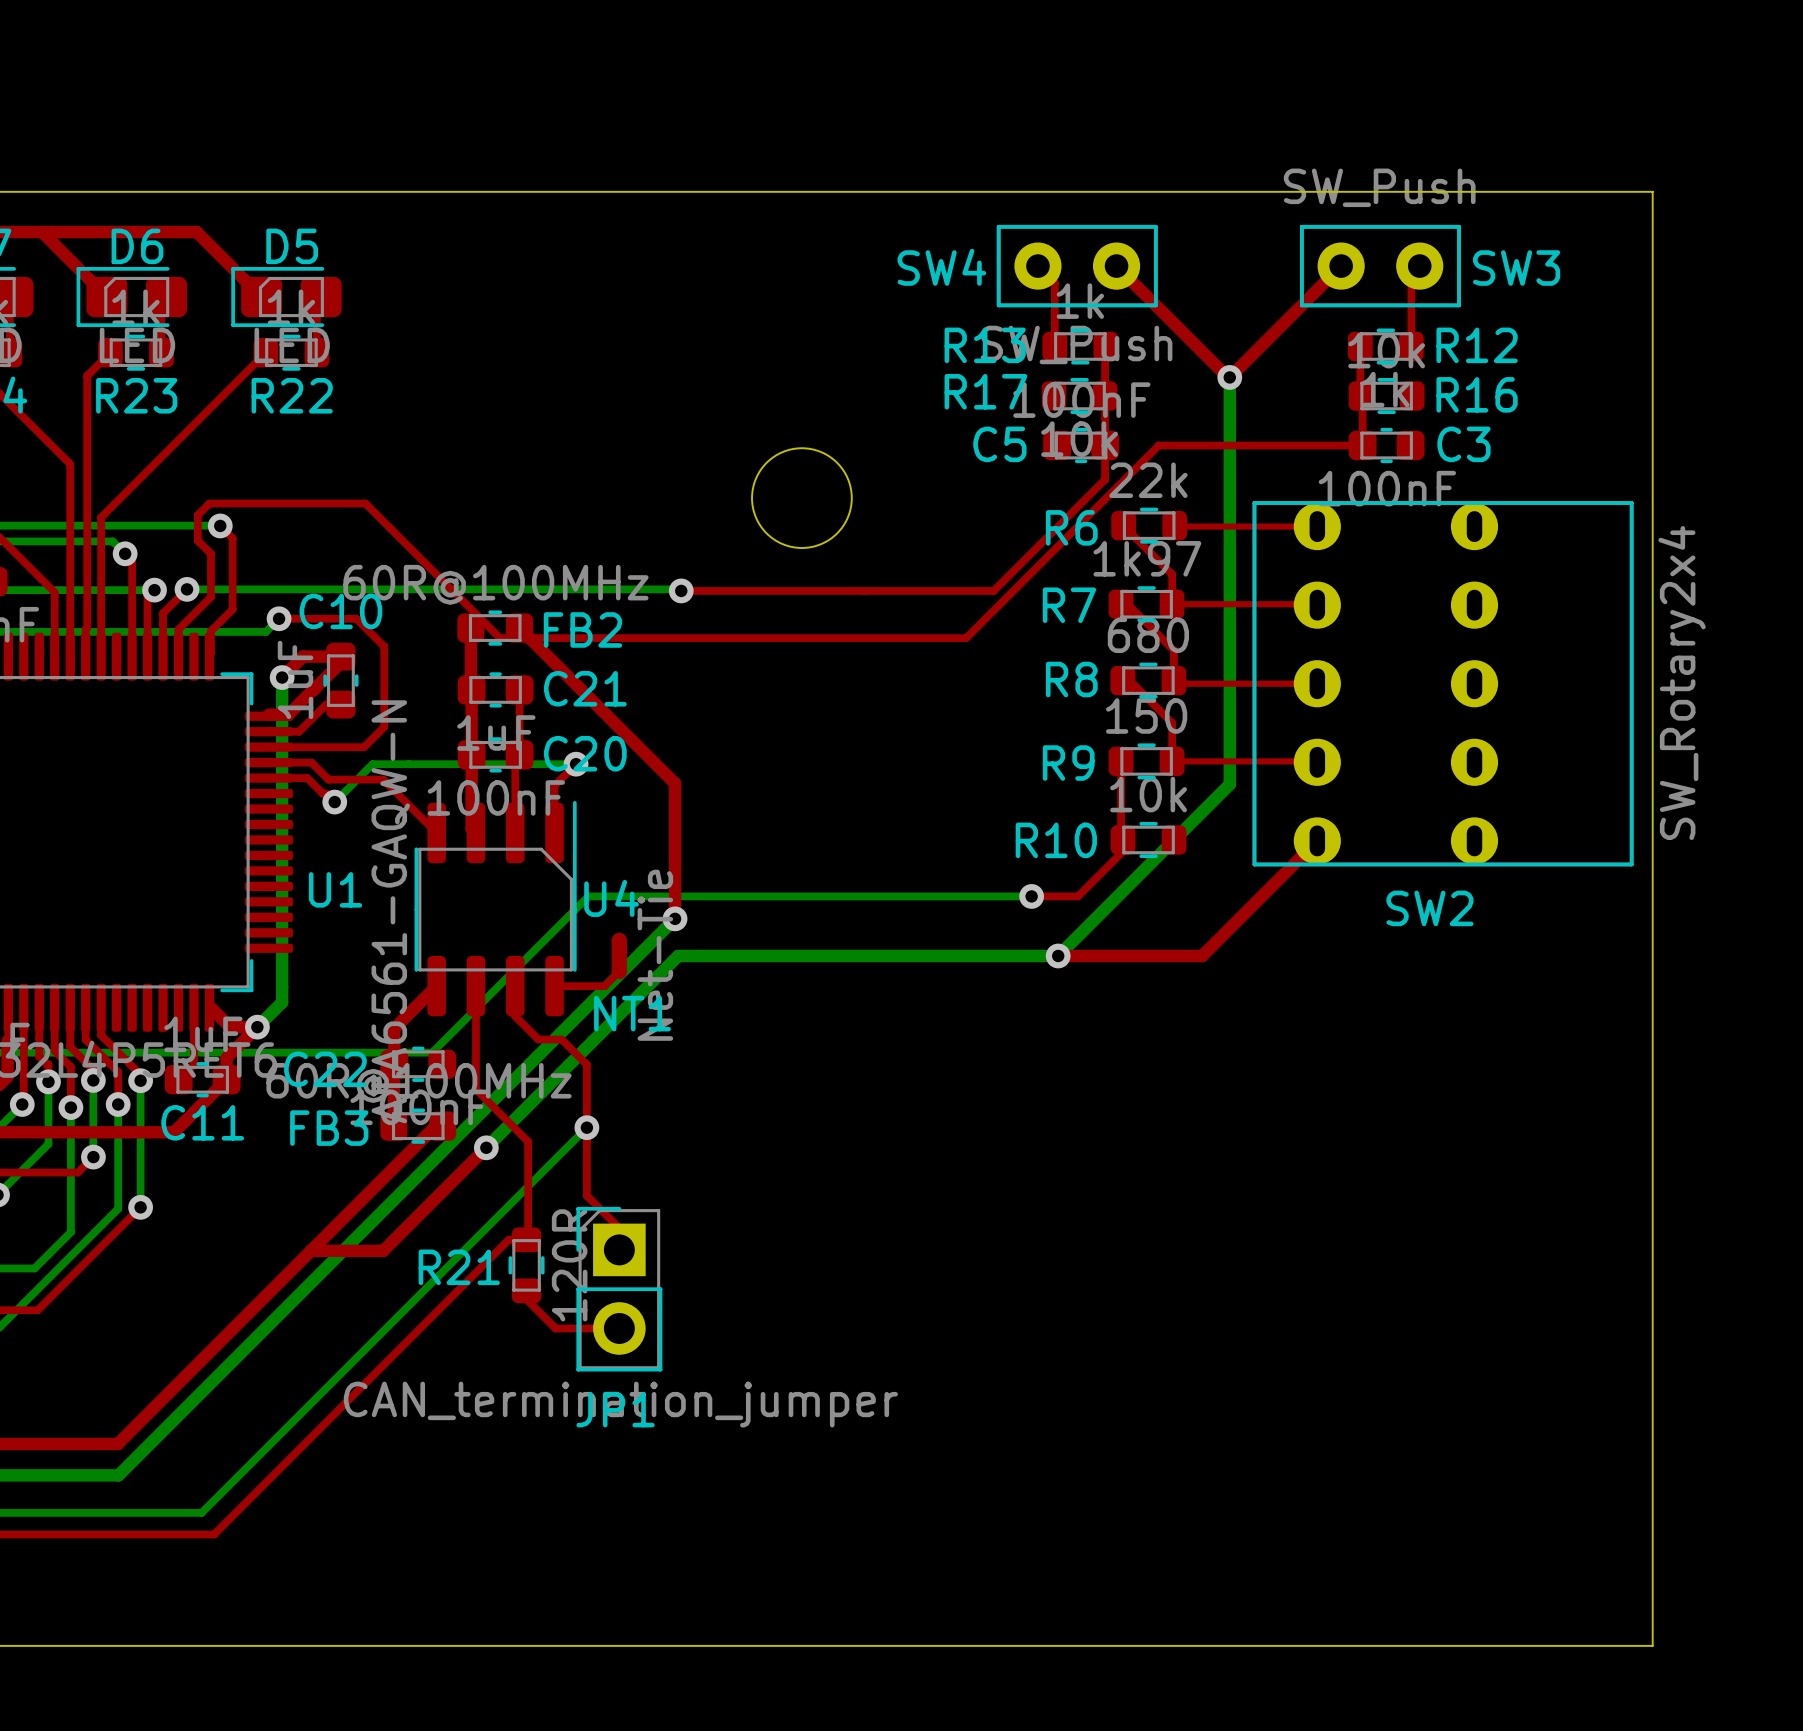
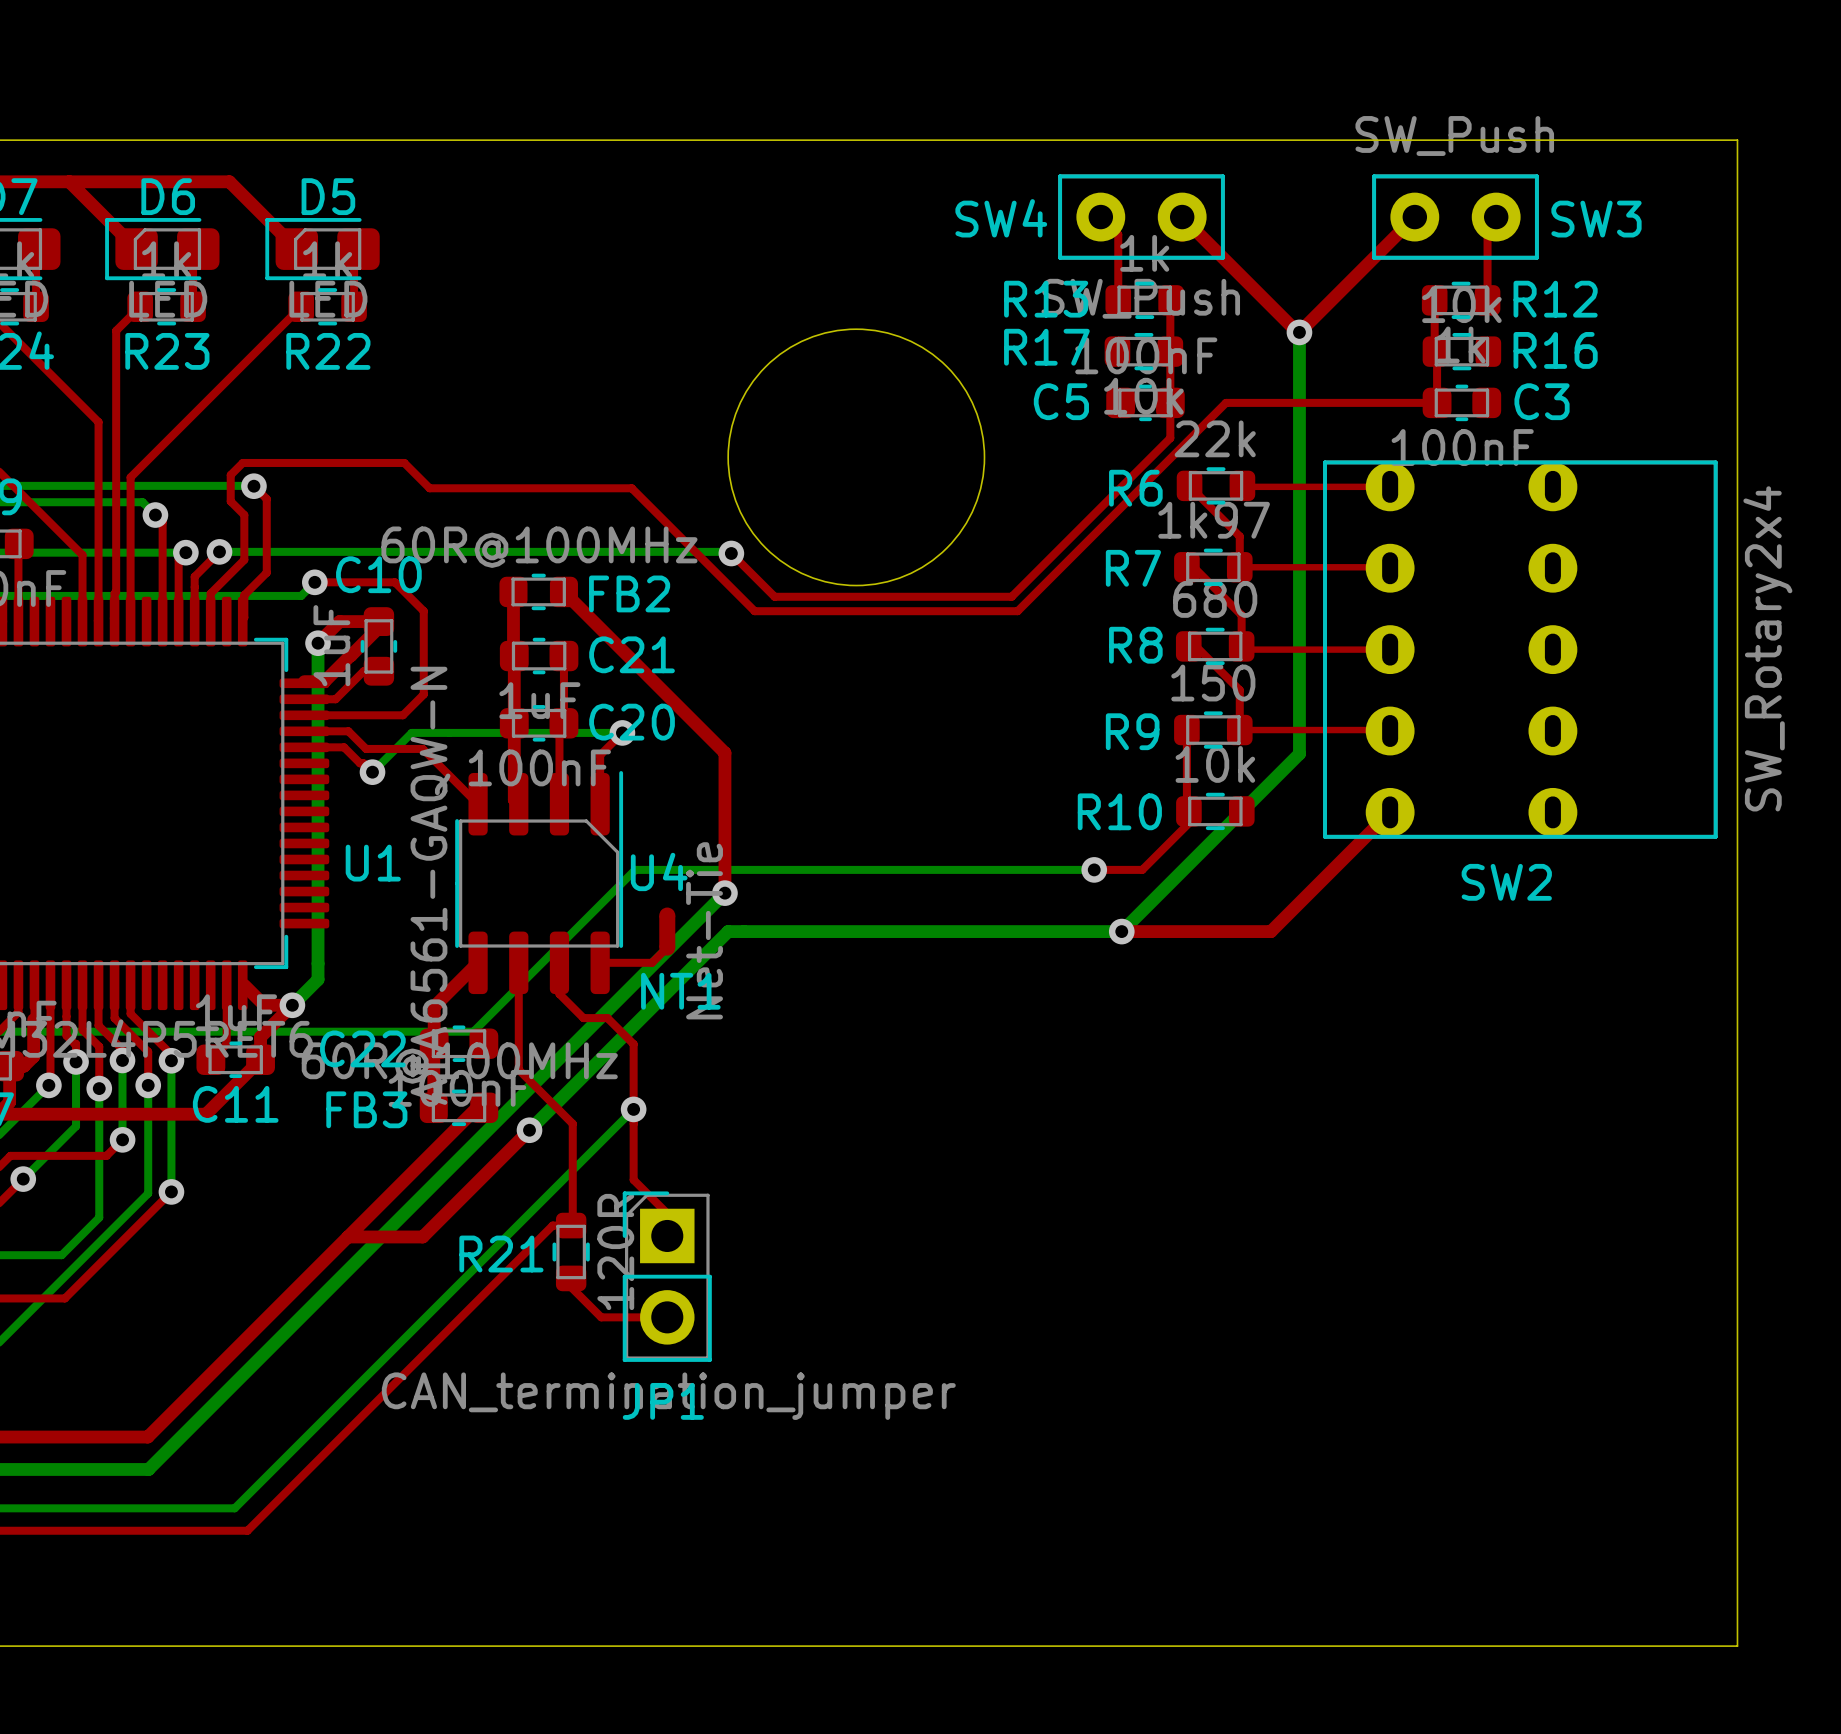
round board edge size: [751, 447, 853, 549] -> [727, 328, 986, 587]
top track: (389, 527) (500, 638) (966, 638) -> (429, 488) (631, 488) (754, 611) (1017, 611) (1026, 602)
top track: (681, 590) (993, 590) -> (731, 553) (774, 596) (1011, 596) (1054, 553)

